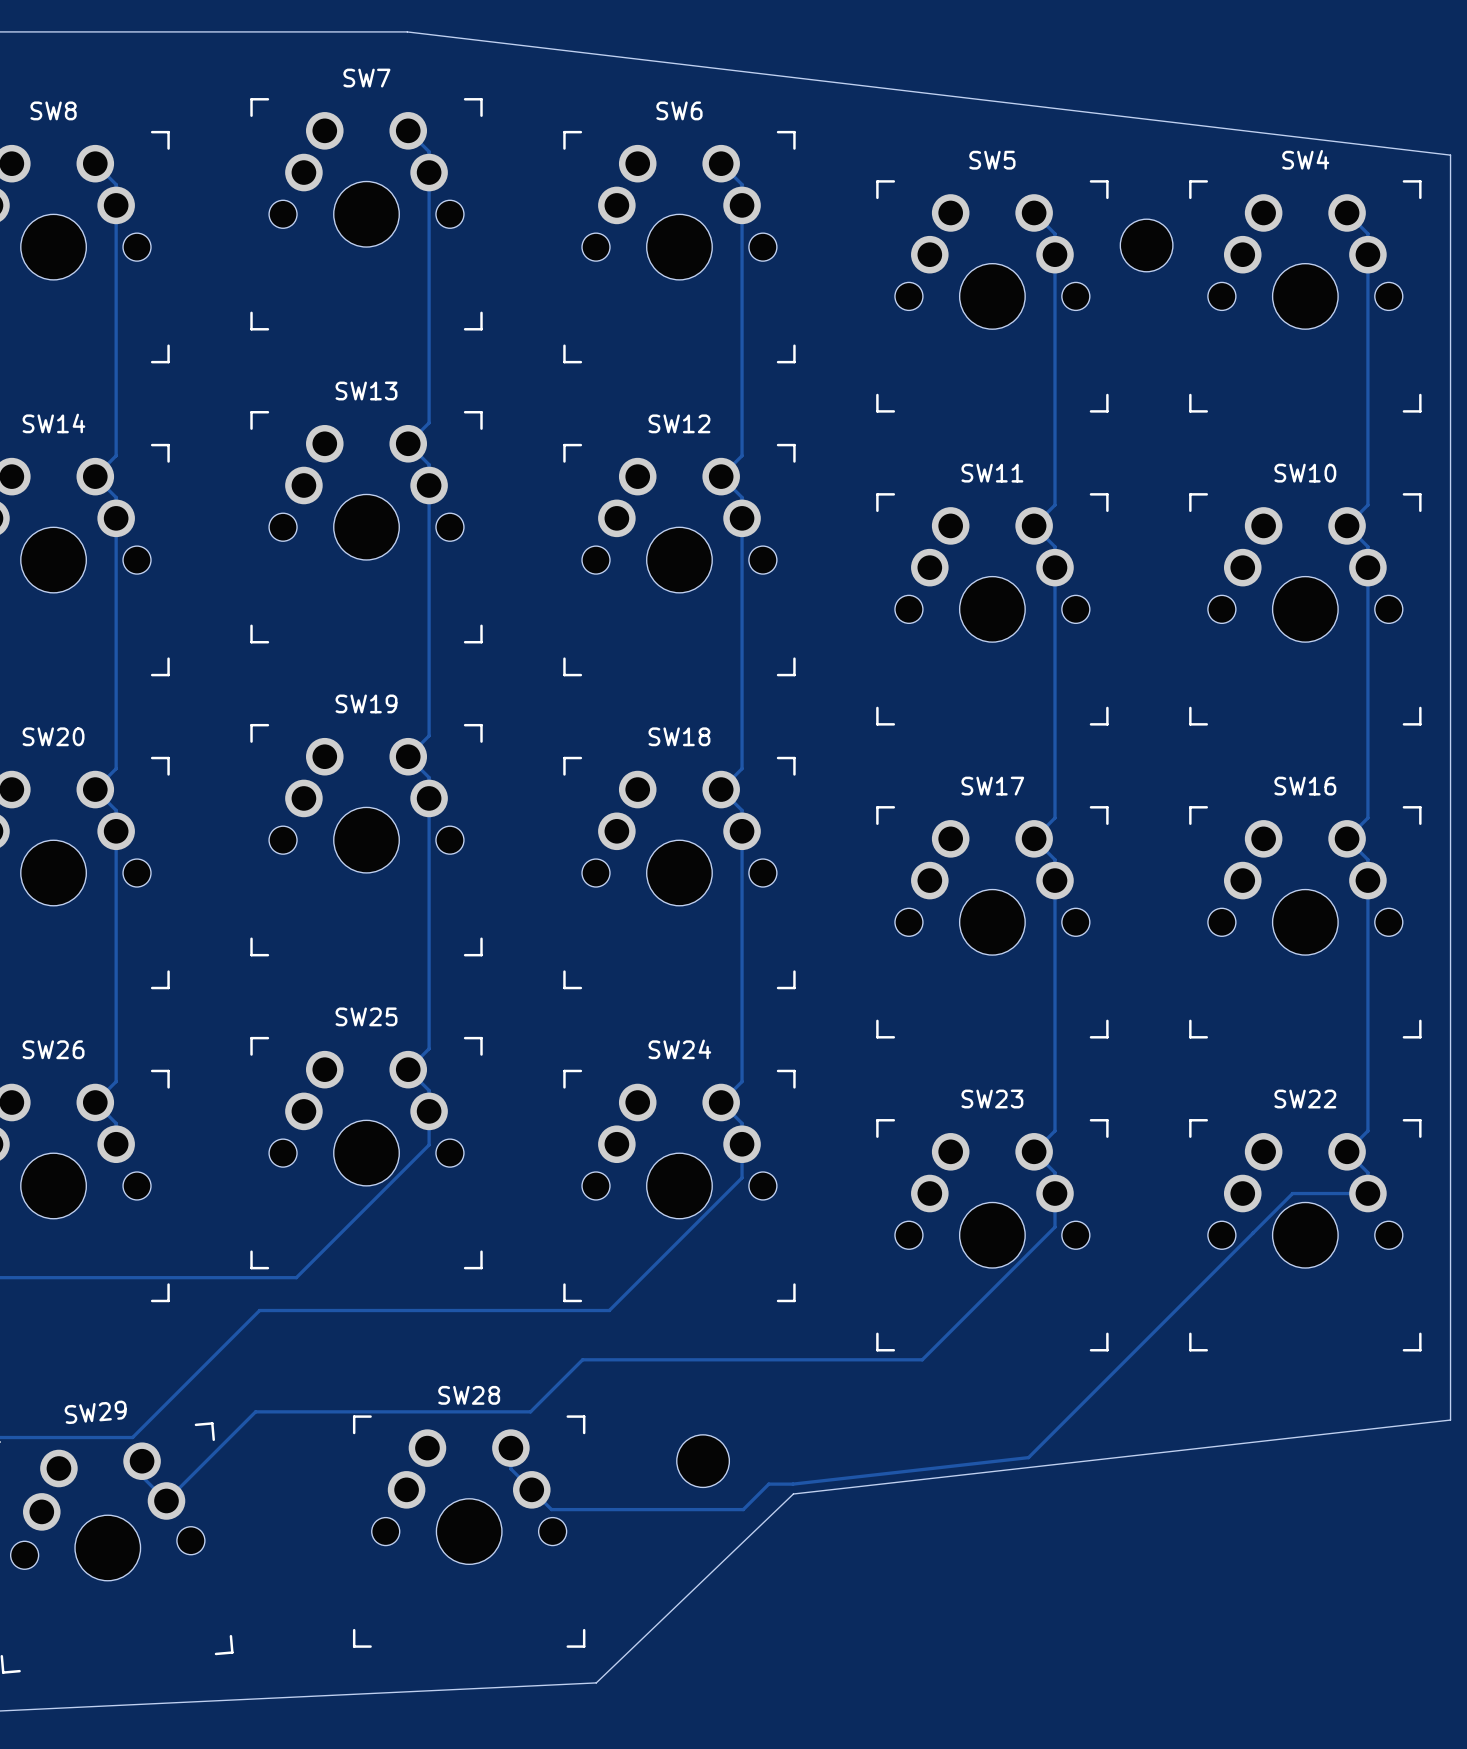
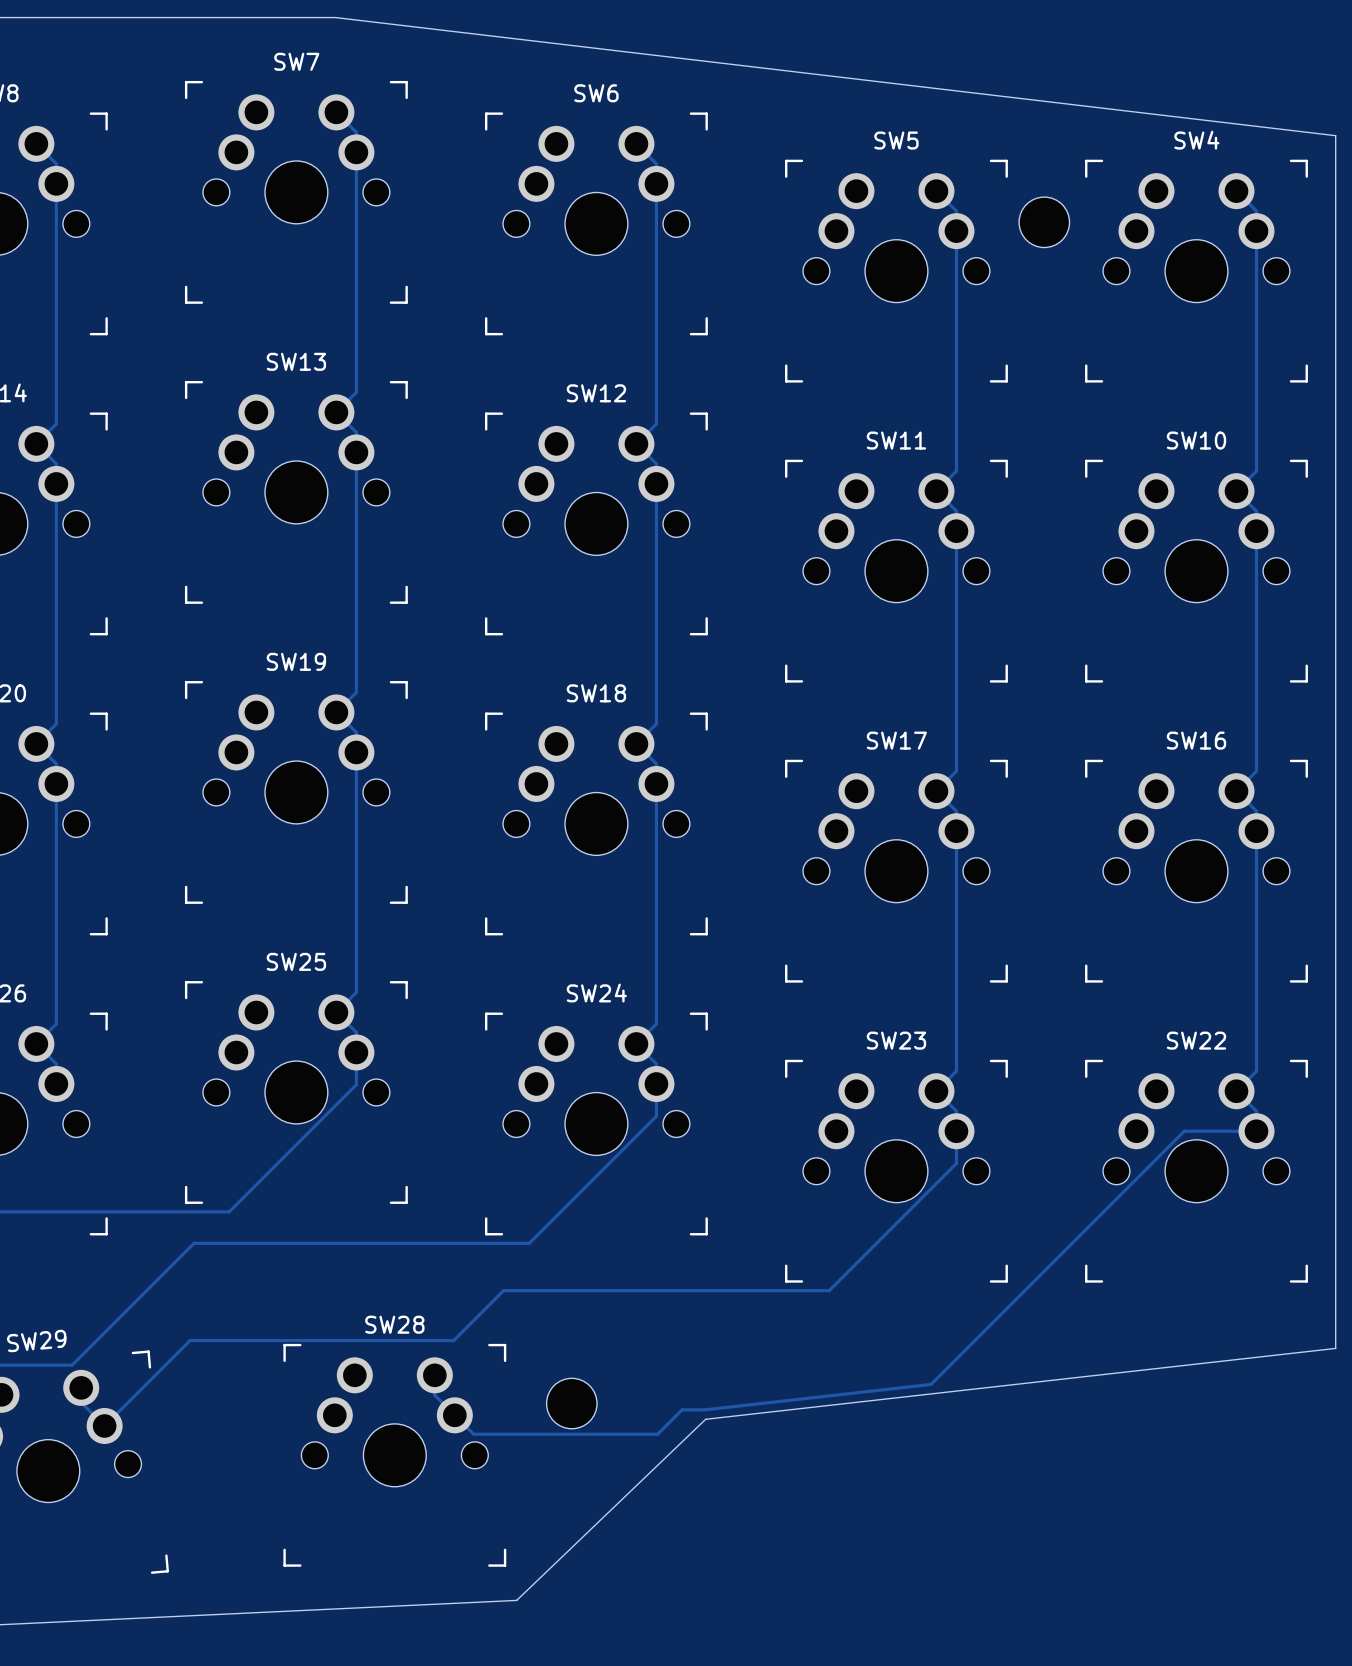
part position: (703, 1461) -> (571, 1403)

